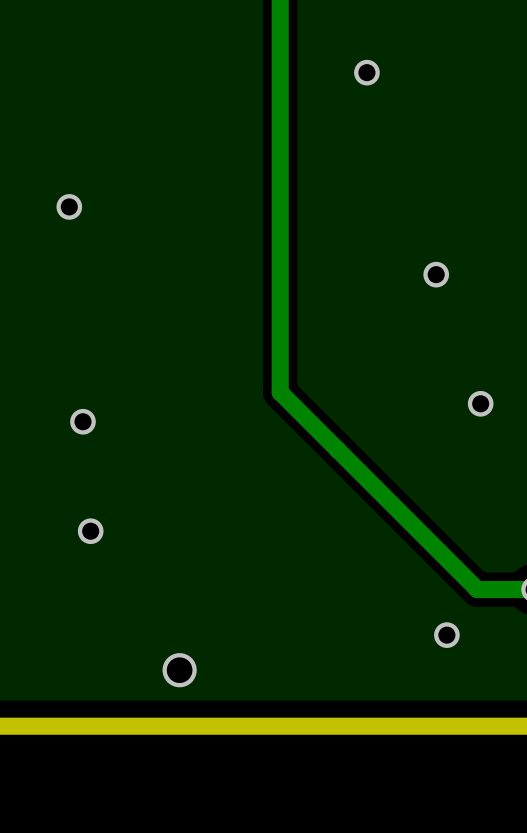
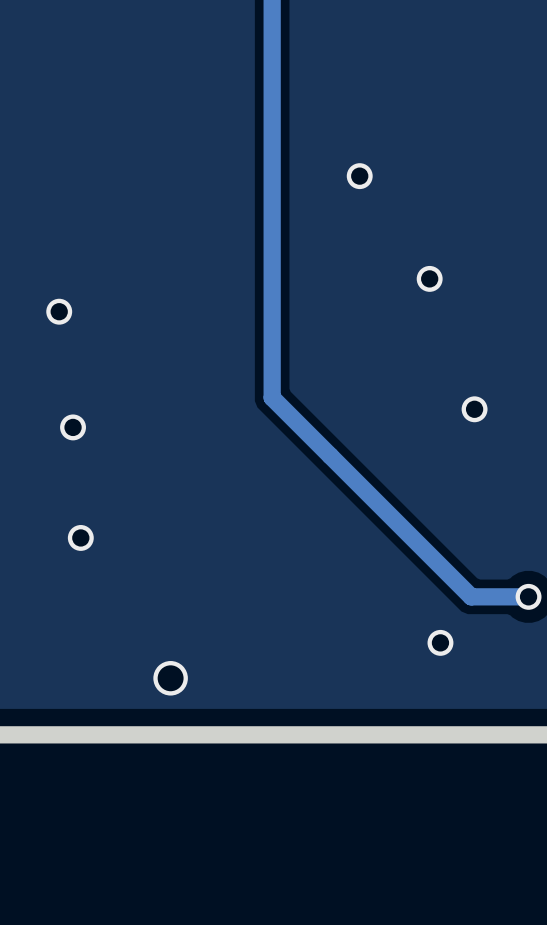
via position: (366, 72) -> (359, 176)
via position: (69, 206) -> (59, 311)

